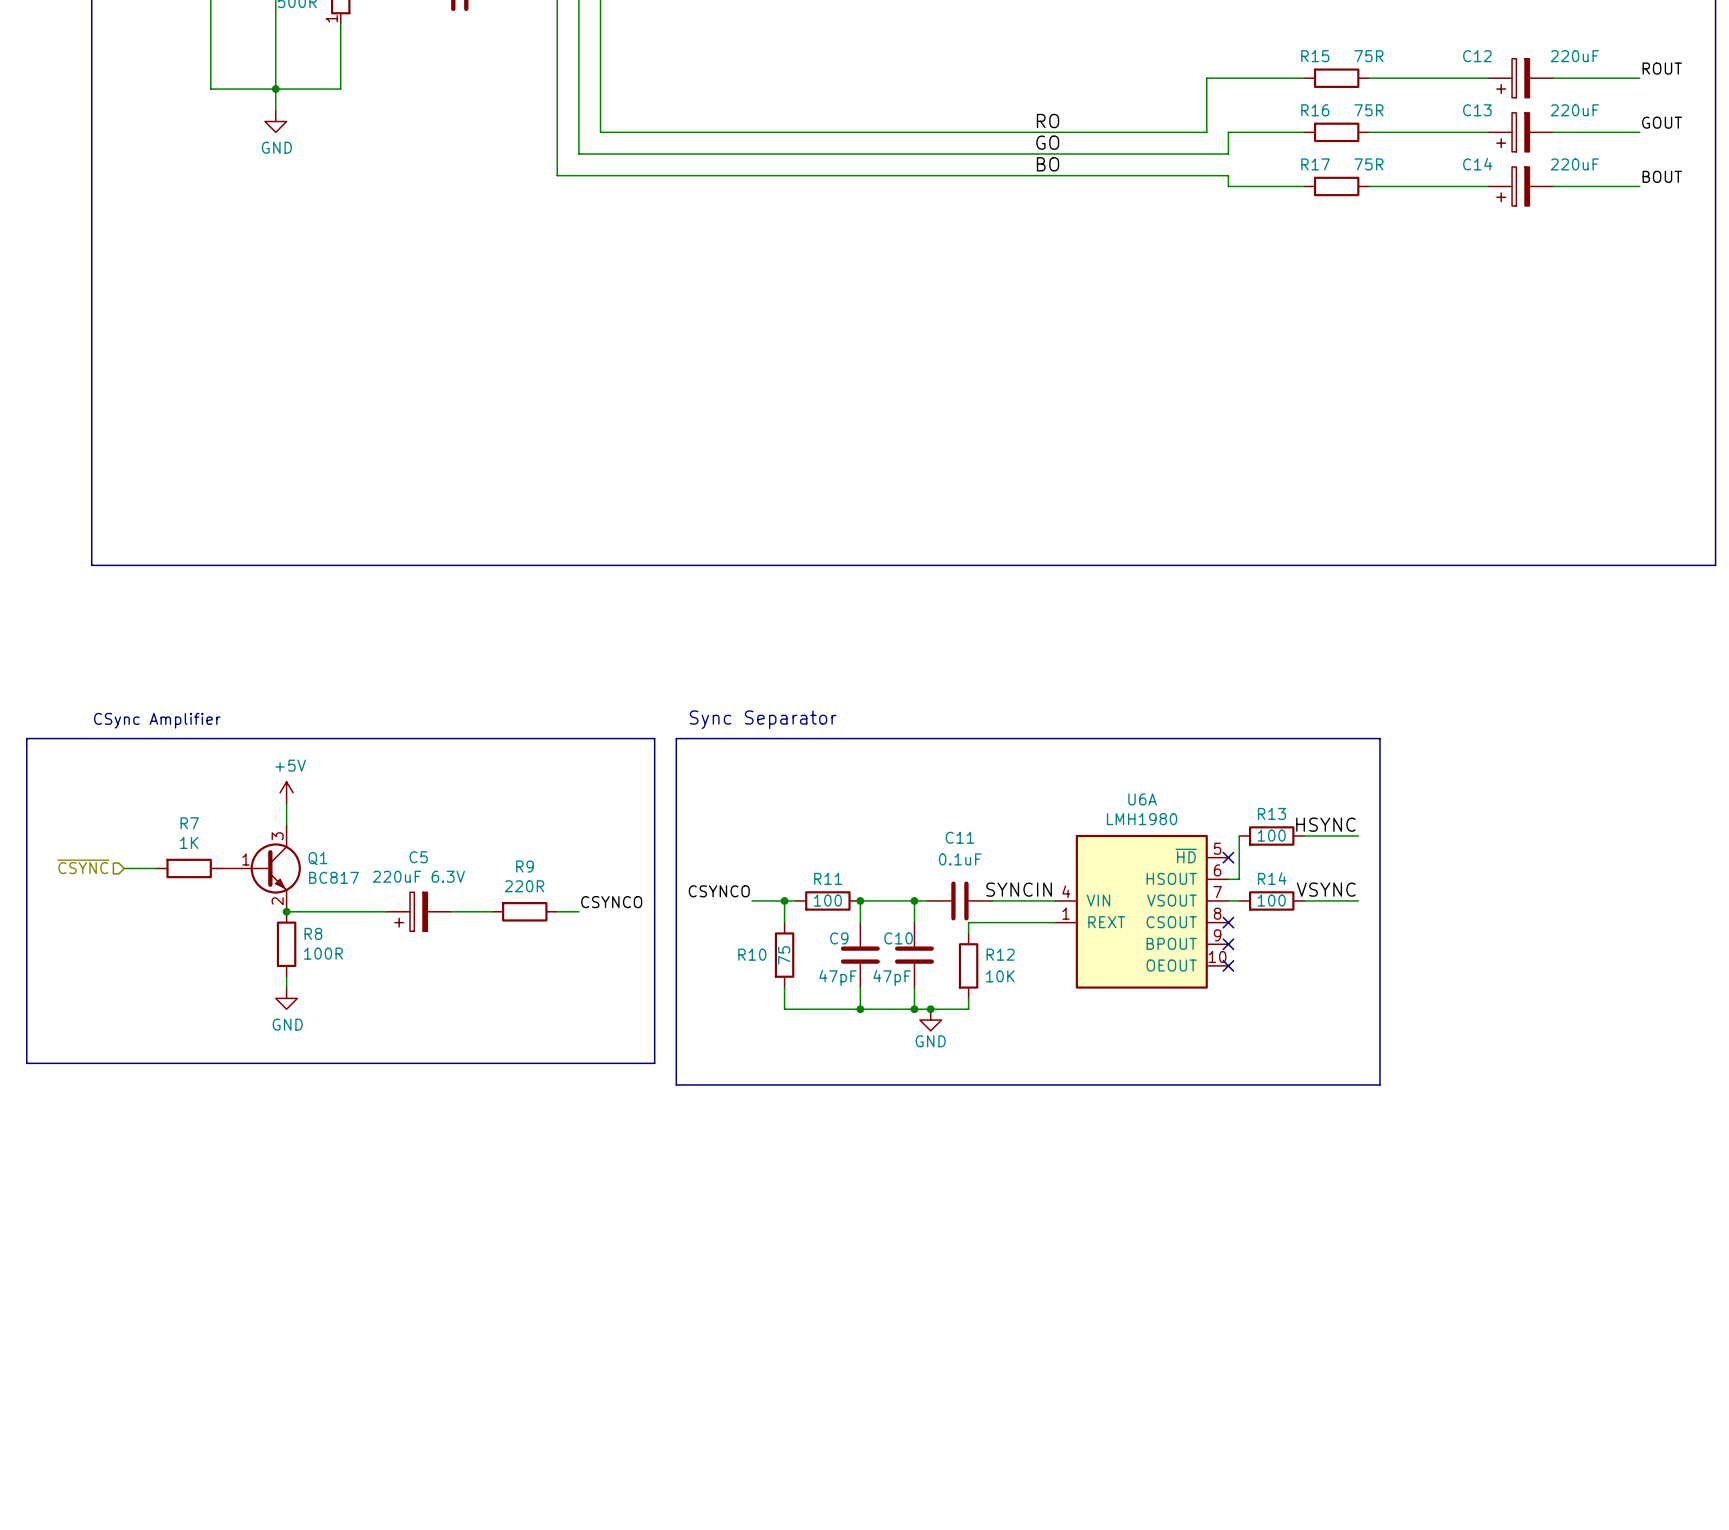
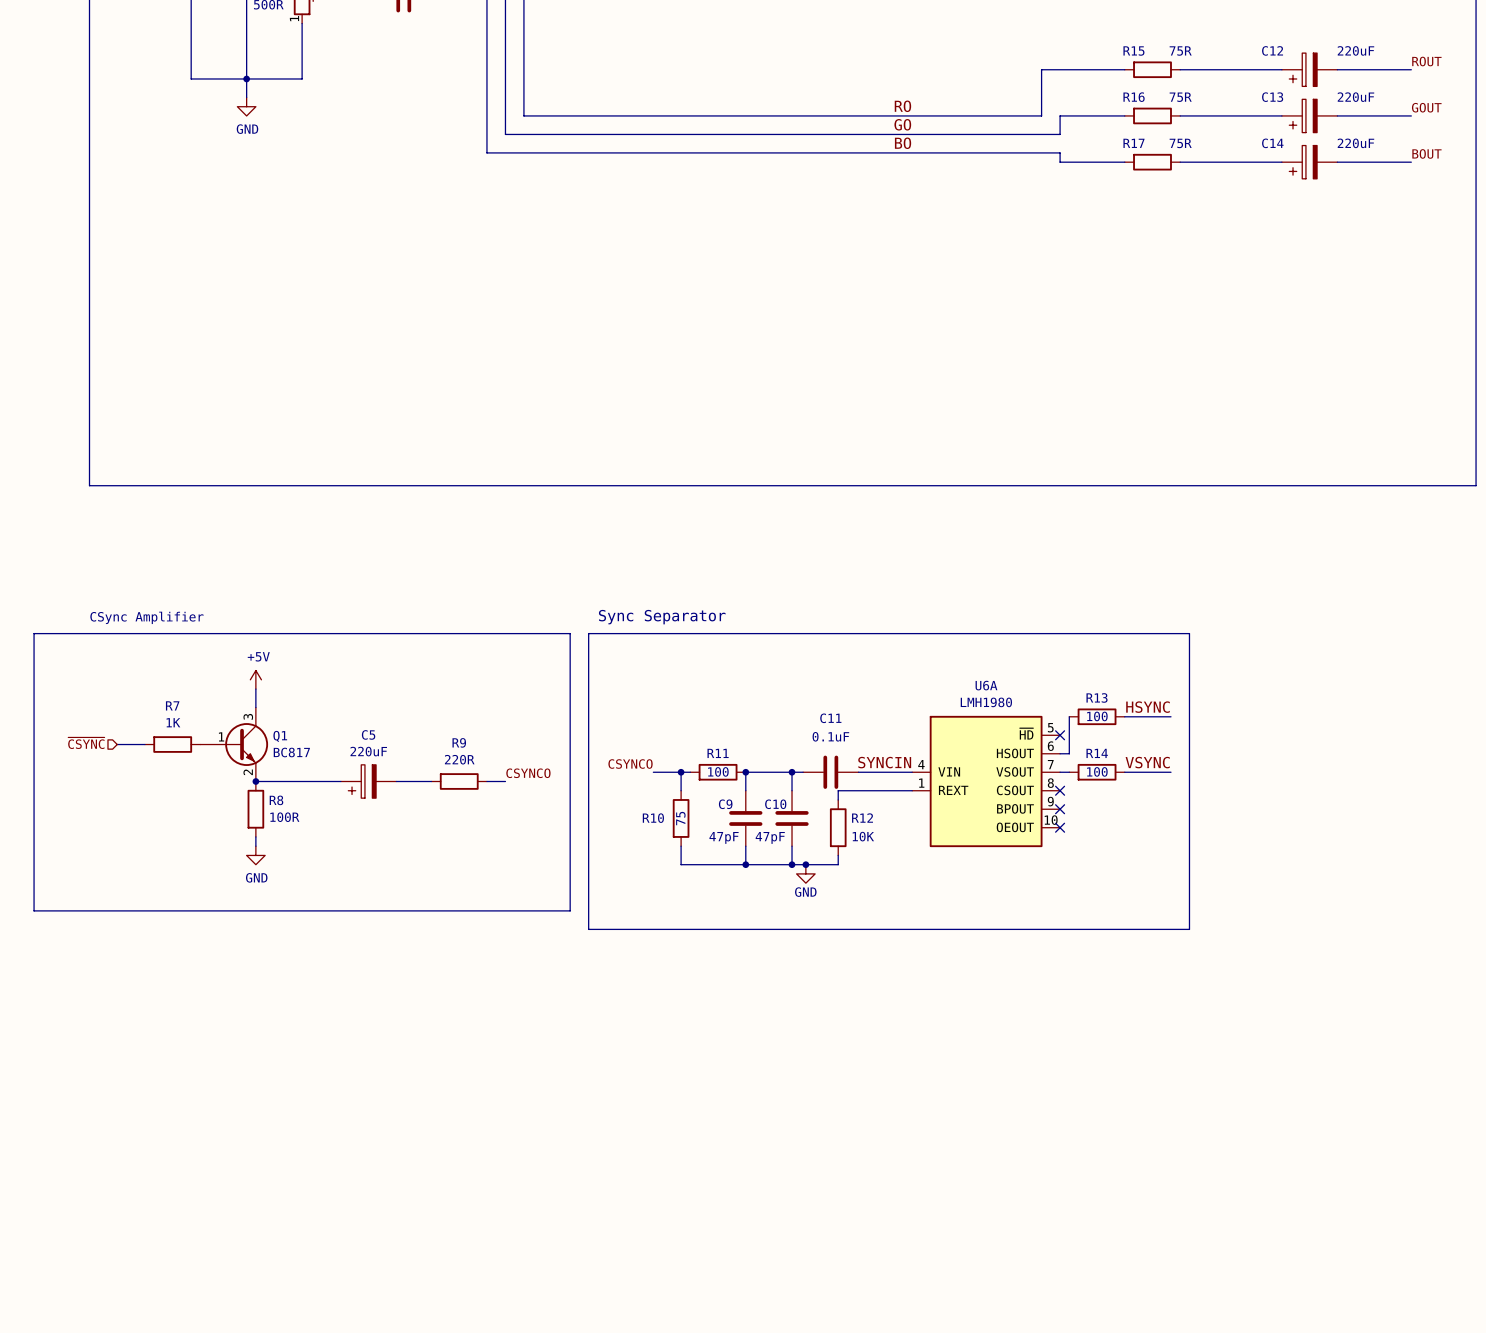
C5 value: 220uF 6.3V (418, 876) -> 220uF (368, 751)

